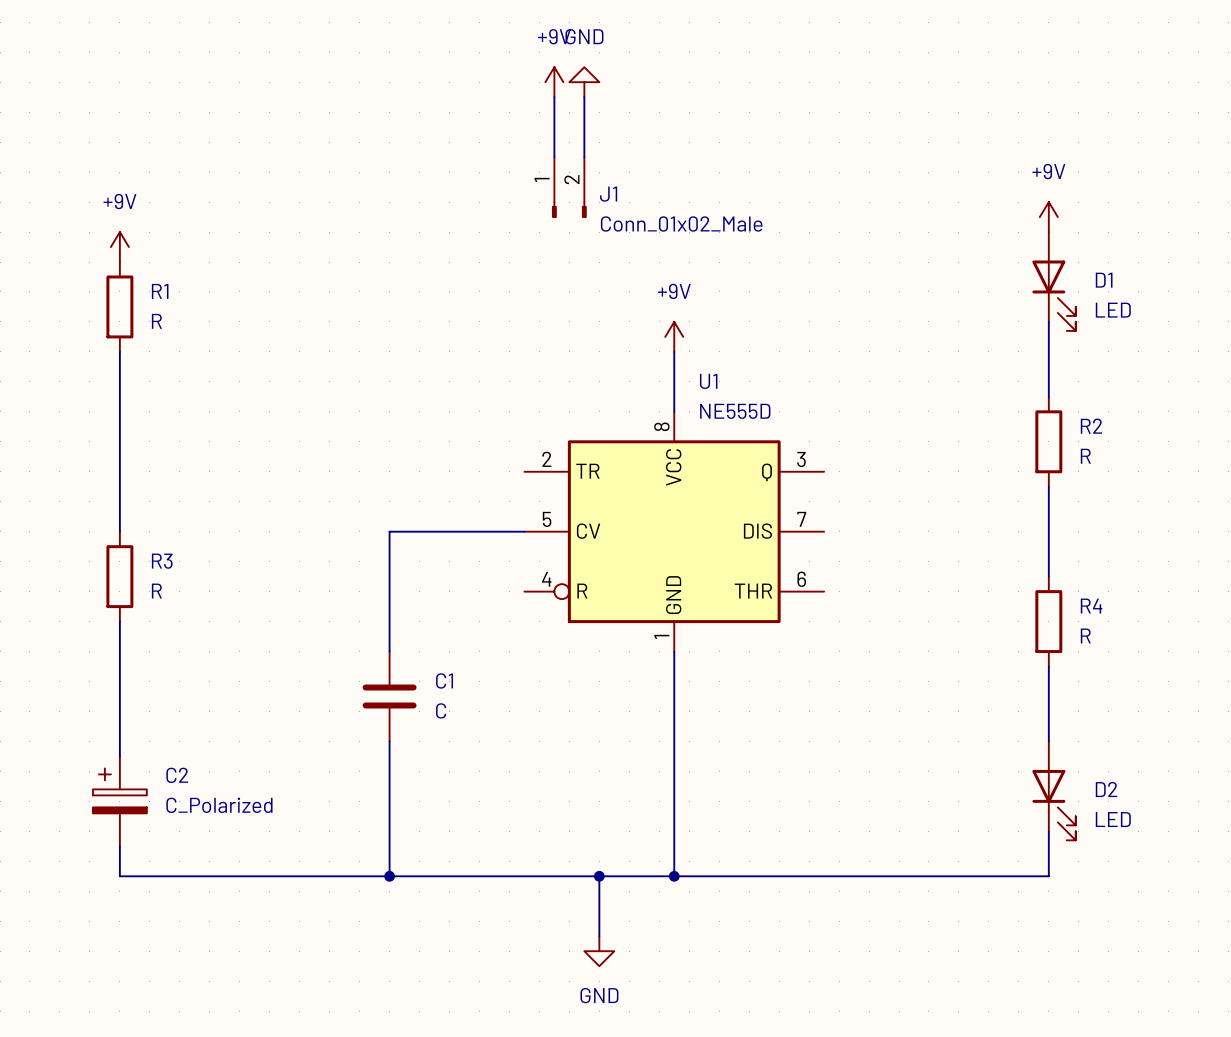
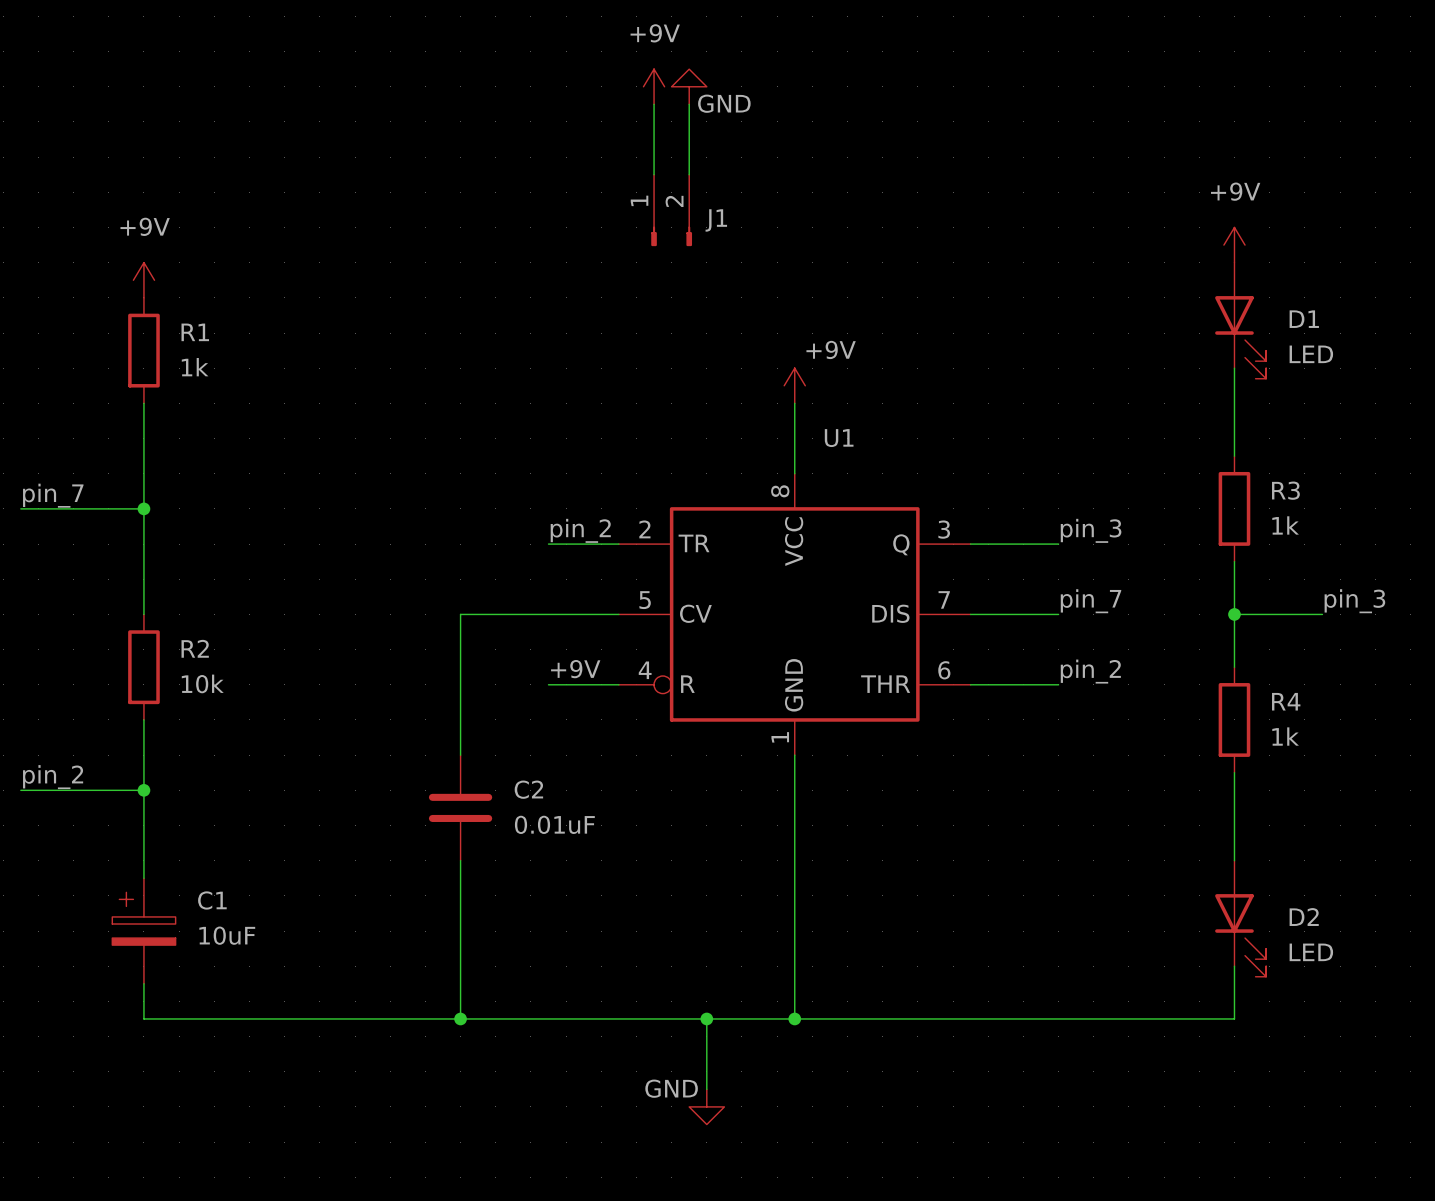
power symbol text position: GND (584, 36) -> GND (724, 103)
J1 value: Conn_01x02_Male (681, 223) -> none
power symbol text position: +9V (674, 291) -> +9V (831, 349)
R1 value: R (156, 321) -> 1k (195, 367)
U1 value: NE555D (735, 411) -> none
R2 name: R2 (1091, 426) -> R3 (1285, 490)
label: none -> pin_7 (53, 495)
wire: none -> (20, 508) (143, 508)
junction: none -> (143, 508)
R2 value: R (1085, 456) -> 1k (1285, 525)
label: none -> pin_2 (580, 530)
label: none -> pin_3 (1091, 530)
wire: none -> (548, 544) (618, 544)
wire: none -> (970, 544) (1058, 544)
label: none -> pin_7 (1091, 601)
label: none -> pin_3 (1354, 601)
wire: none -> (970, 614) (1058, 614)
wire: none -> (1234, 614) (1322, 614)
junction: none -> (1234, 614)
R3 name: R3 (162, 561) -> R2 (195, 648)
label: none -> +9V (575, 669)
label: none -> pin_2 (1090, 671)
R3 value: R (156, 591) -> 10k (202, 683)
wire: none -> (548, 684) (618, 684)
wire: none -> (970, 684) (1058, 684)
R4 value: R (1085, 636) -> 1k (1285, 736)
label: none -> pin_2 (53, 777)
C1 name: C1 (444, 680) -> C2 (528, 789)
wire: none -> (20, 790) (143, 790)
junction: none -> (143, 790)
C1 value: C (441, 710) -> 0.01uF (554, 824)
C2 name: C2 (177, 775) -> C1 (212, 900)
C2 value: C_Polarized (219, 805) -> 10uF (227, 935)
power symbol text position: GND (599, 995) -> GND (671, 1088)

